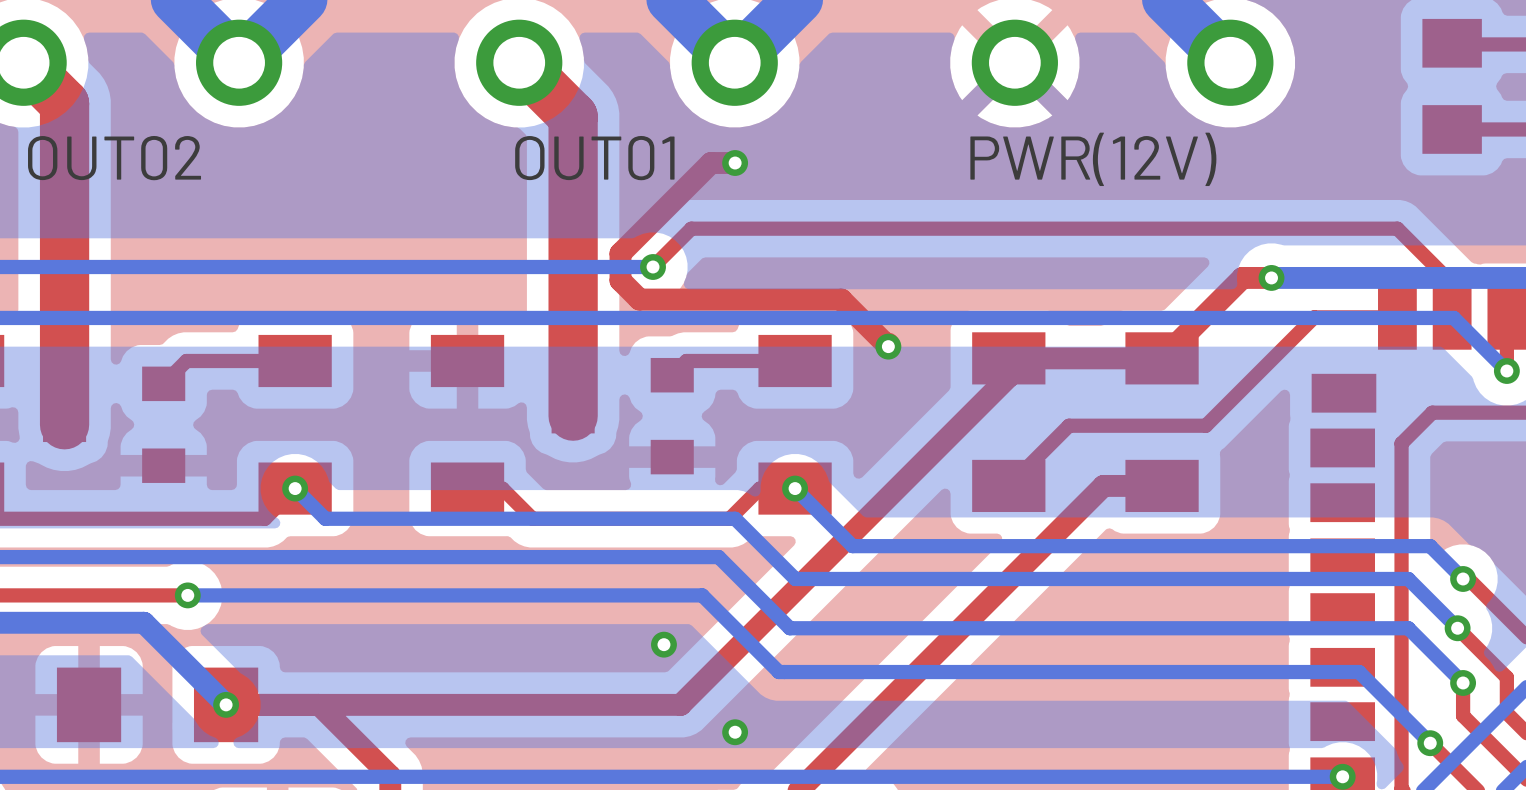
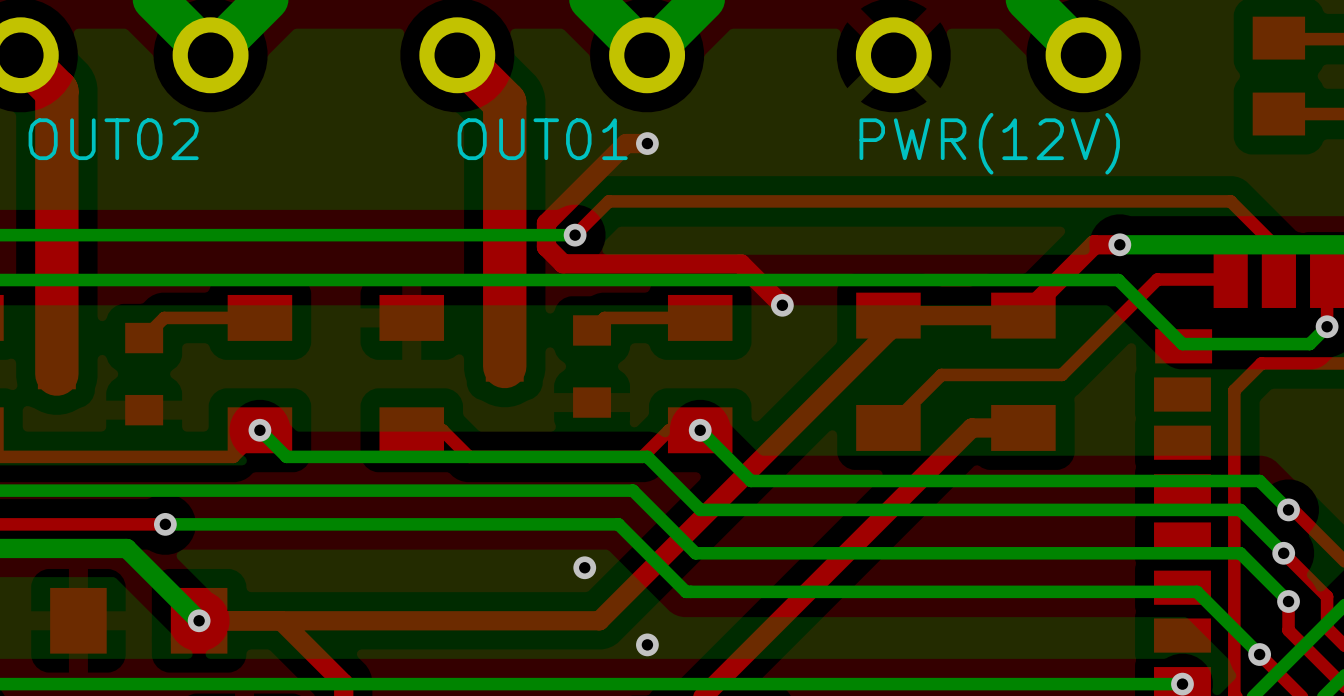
bottom track: (1269, 317) (1453, 317) (1506, 370) -> (1118, 280) (1182, 344) (1309, 344) (1327, 326)

